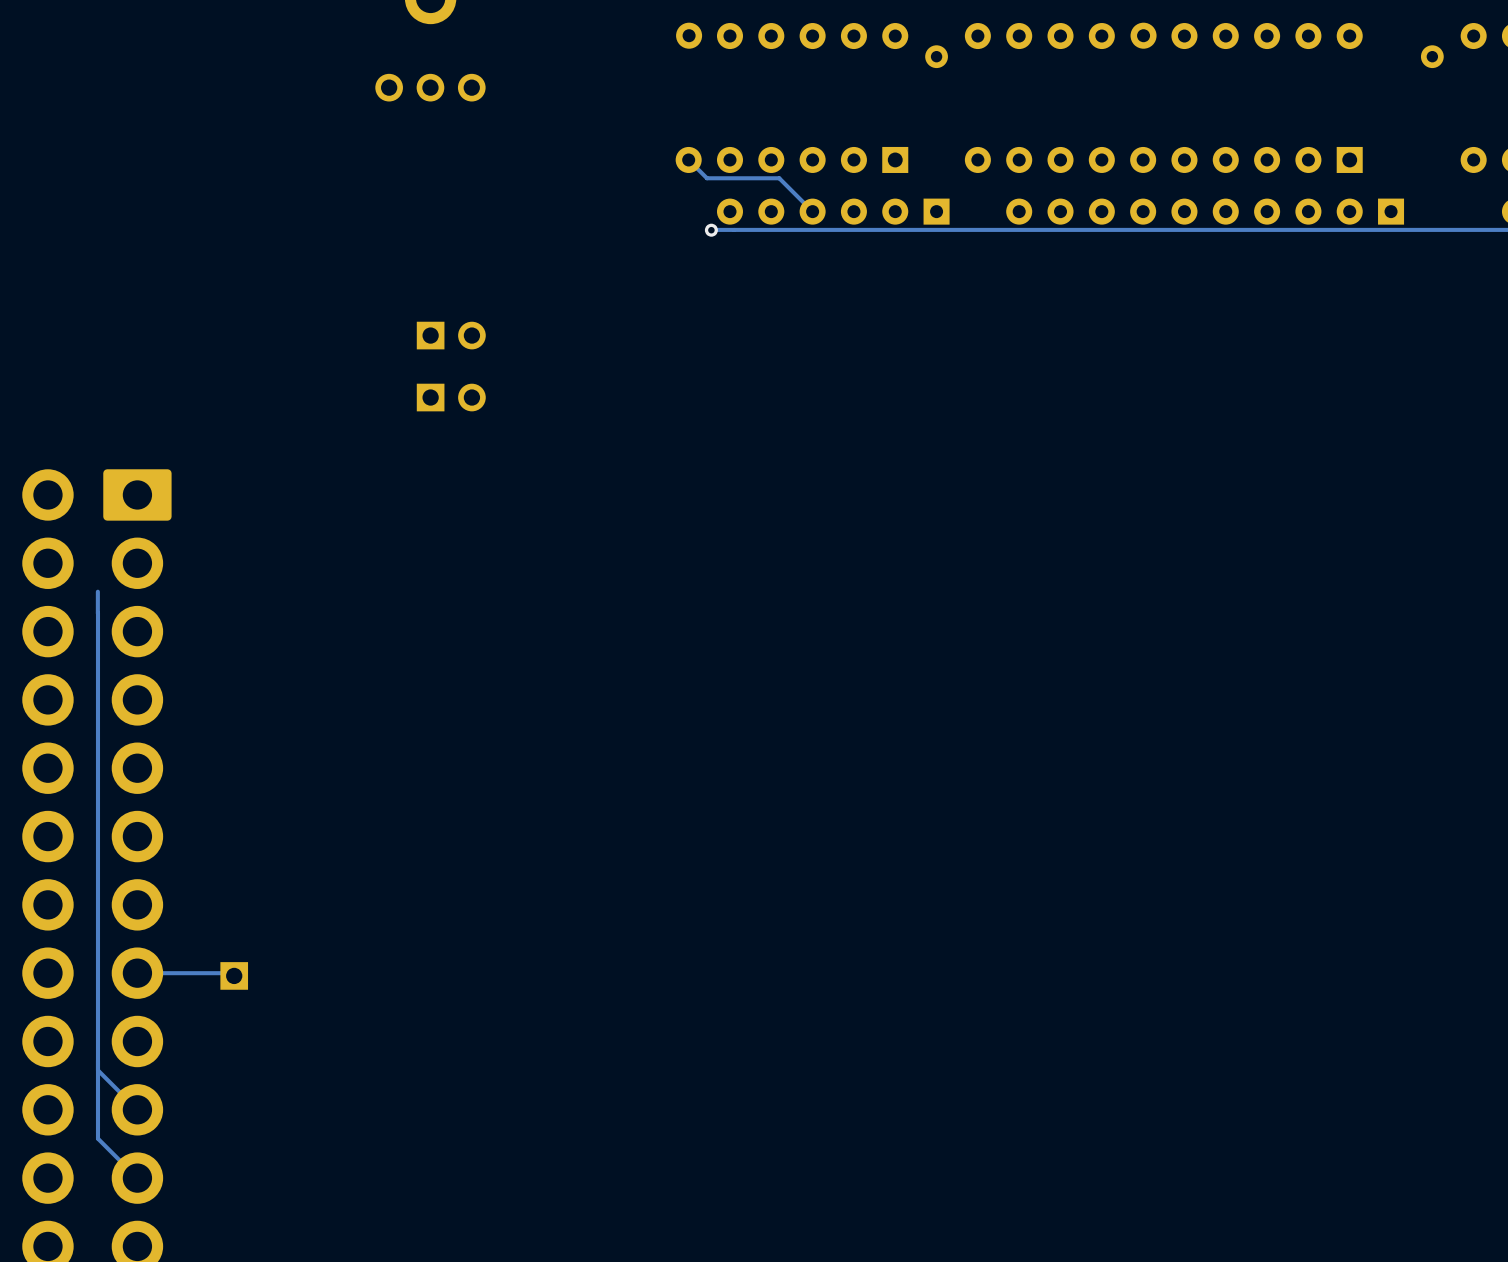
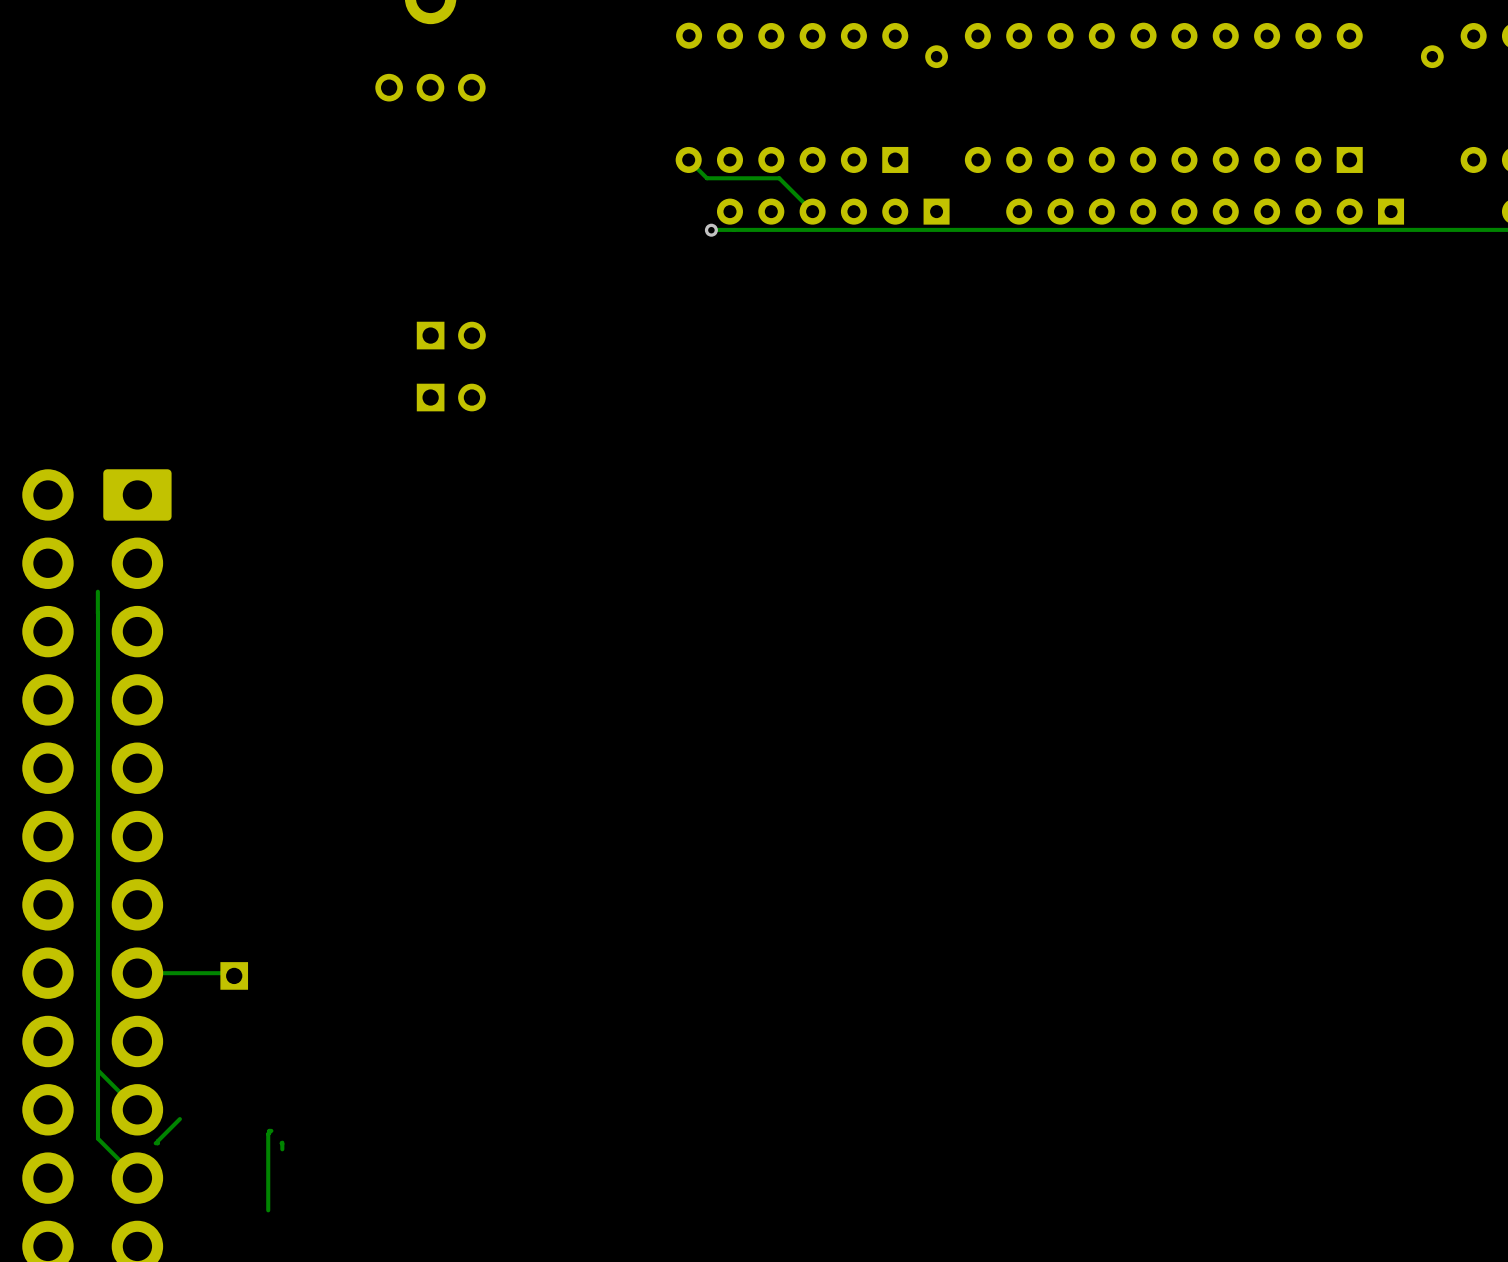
track: none -> (179, 1119) (155, 1143)
track: none -> (271, 1130) (268, 1134) (268, 1210)
track: none -> (282, 1142) (282, 1149)

